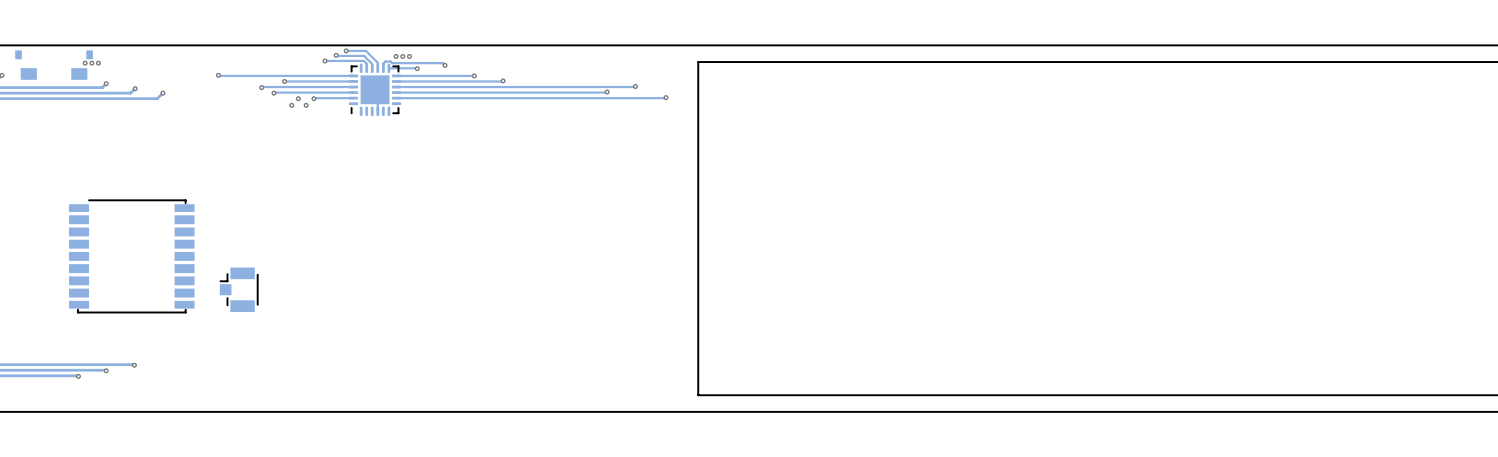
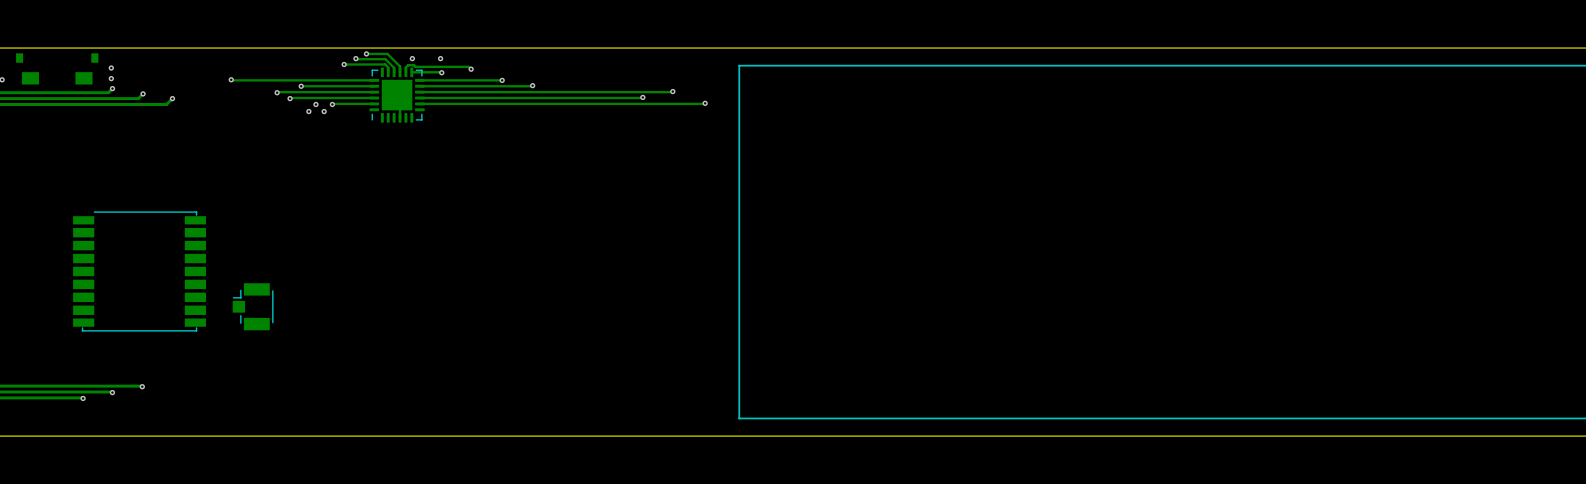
via: none -> (412, 58)
via: none -> (440, 58)
via: (396, 56) -> none
via: (402, 56) -> none
via: (409, 56) -> none
via: (85, 63) -> none
via: (91, 63) -> none
via: (98, 63) -> none
via: none -> (111, 68)
via: none -> (111, 78)

